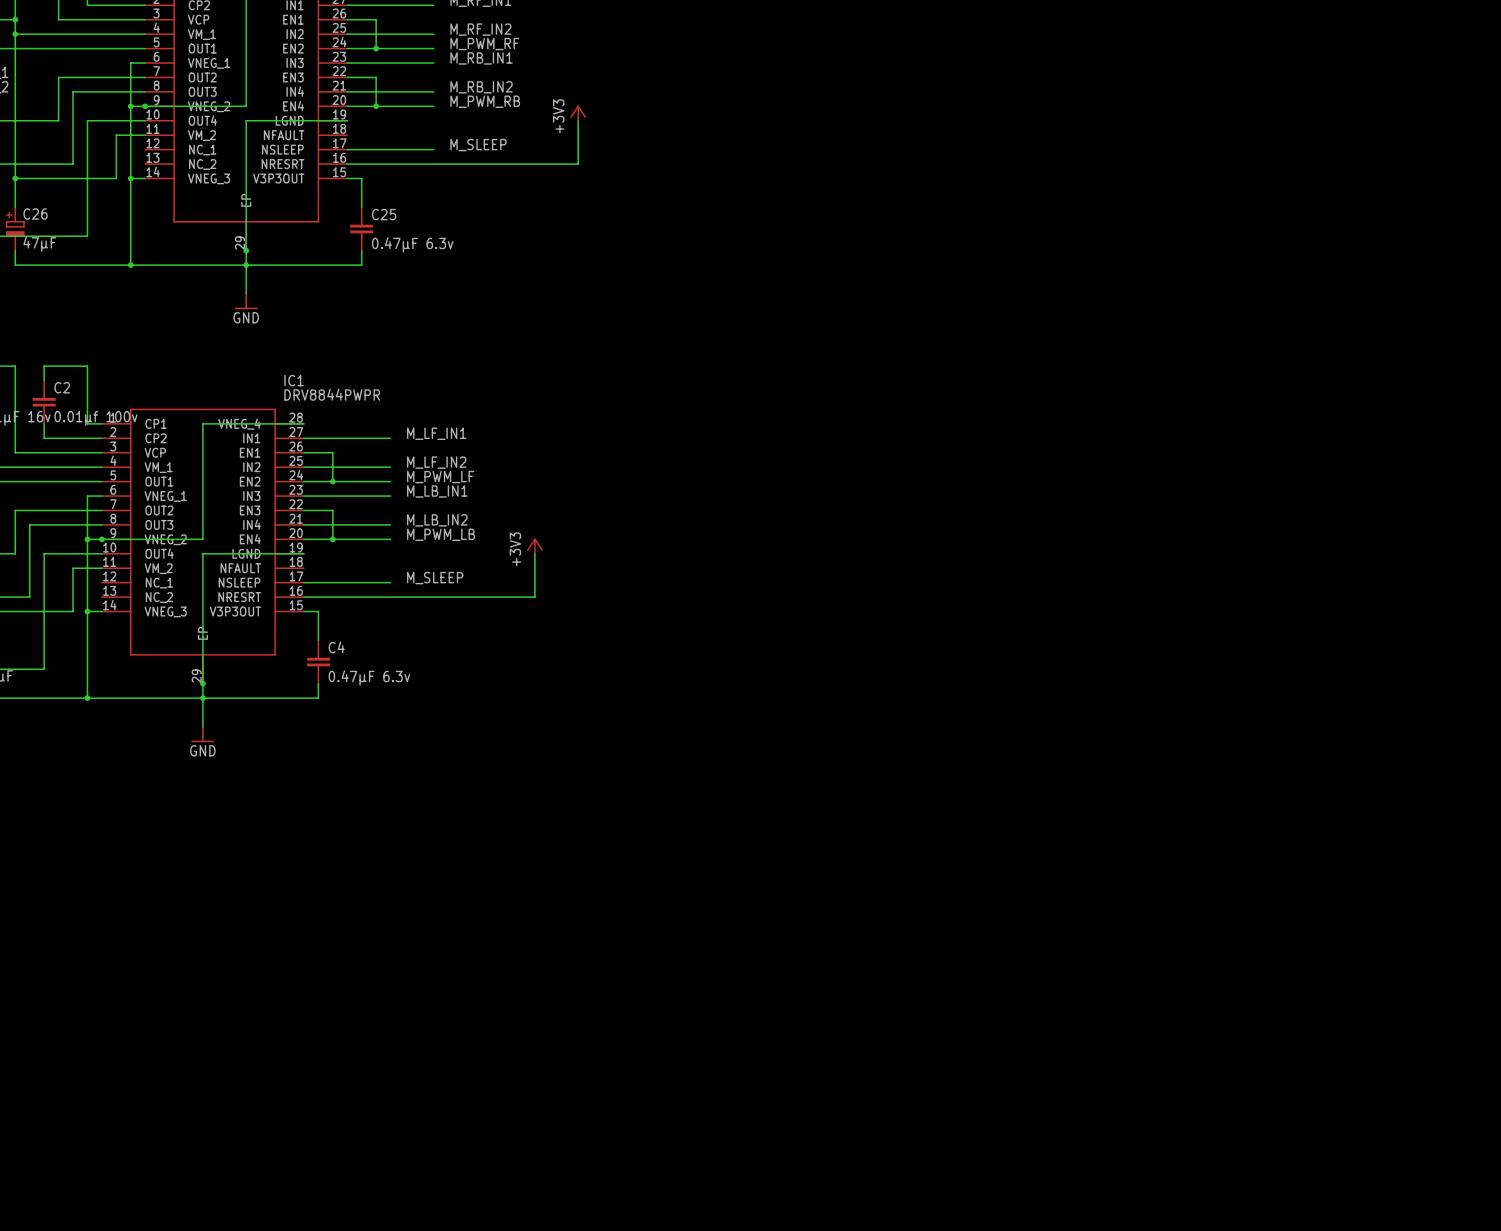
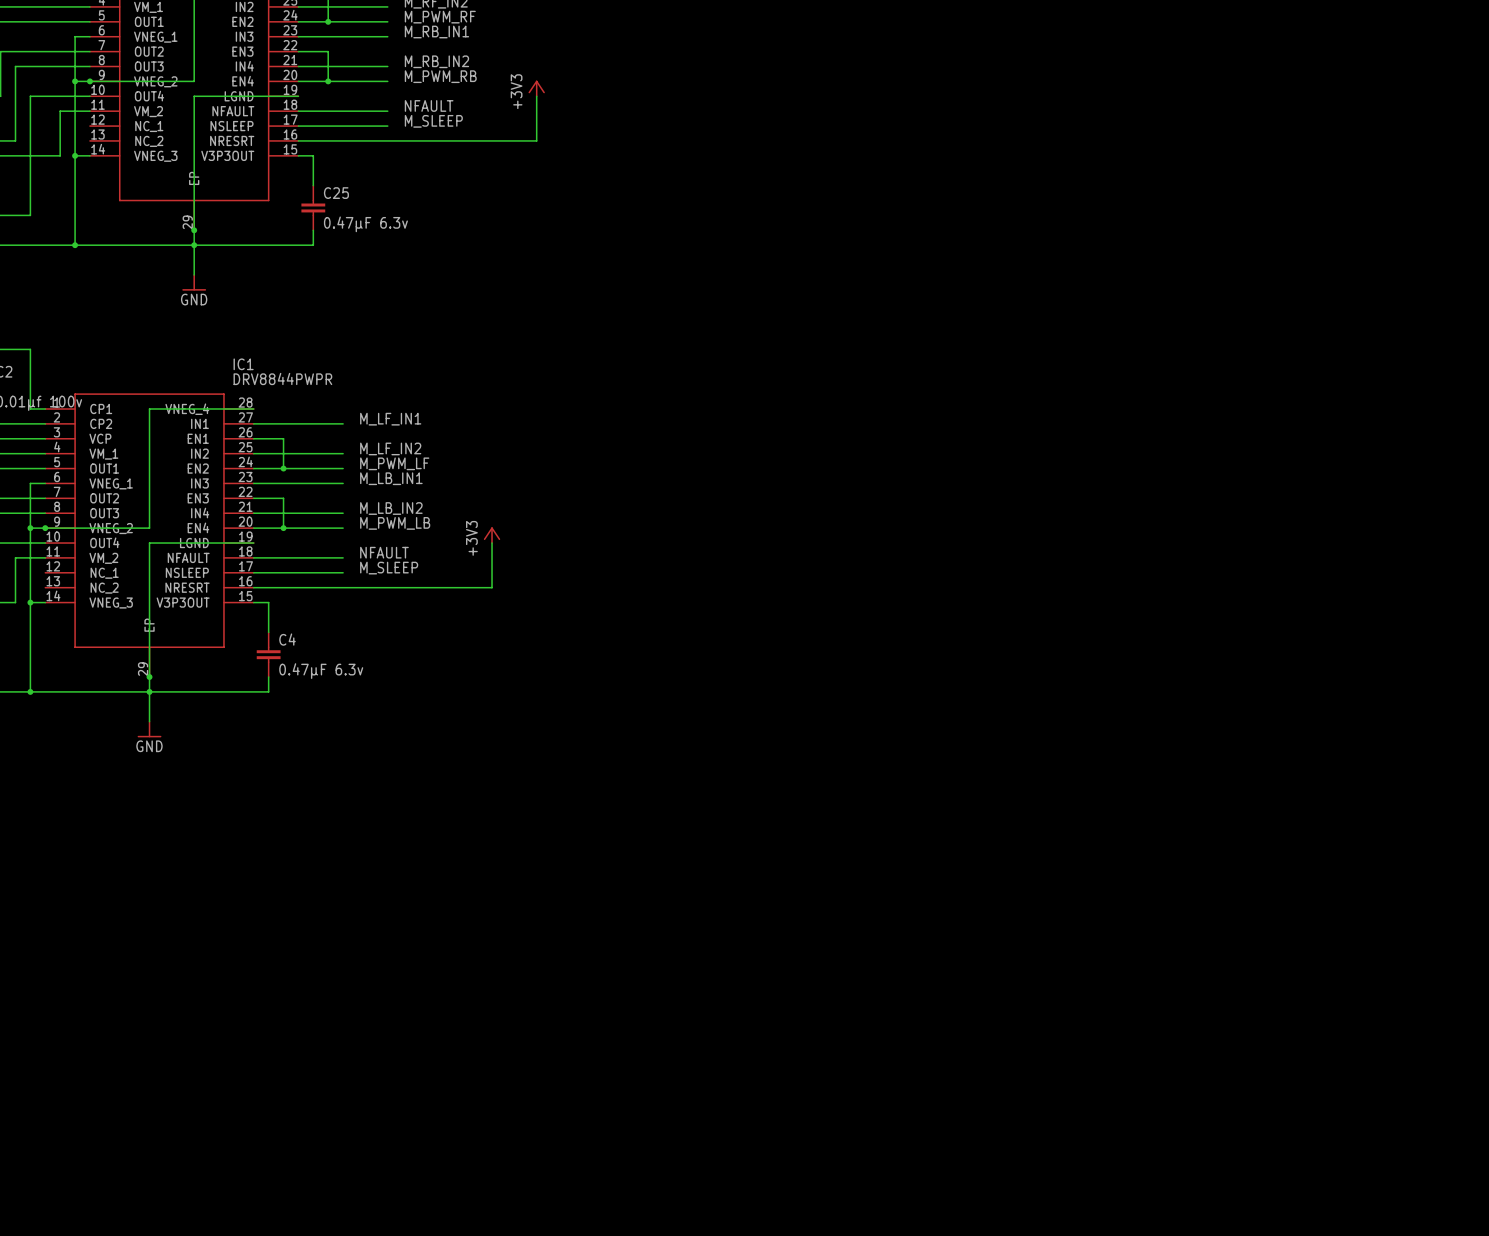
label: none -> NFAULT (429, 105)
wire: none -> (298, 111) (387, 111)
label: none -> NFAULT (384, 552)
wire: none -> (253, 557) (343, 557)

